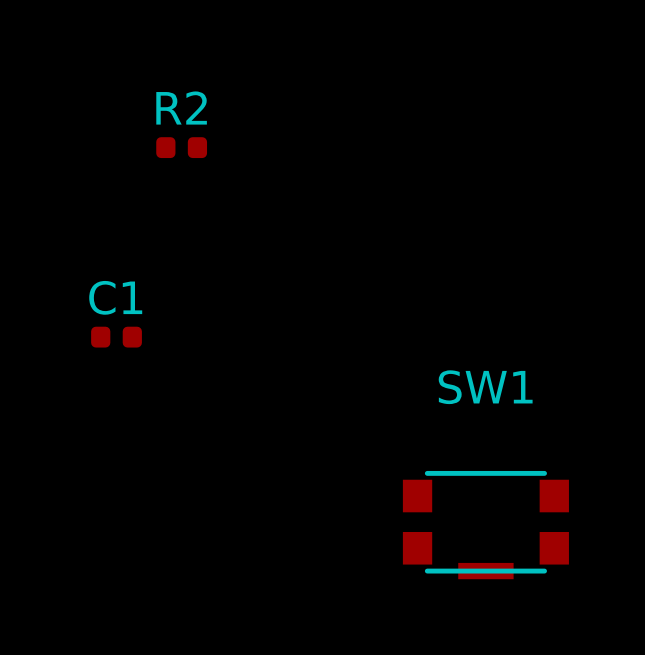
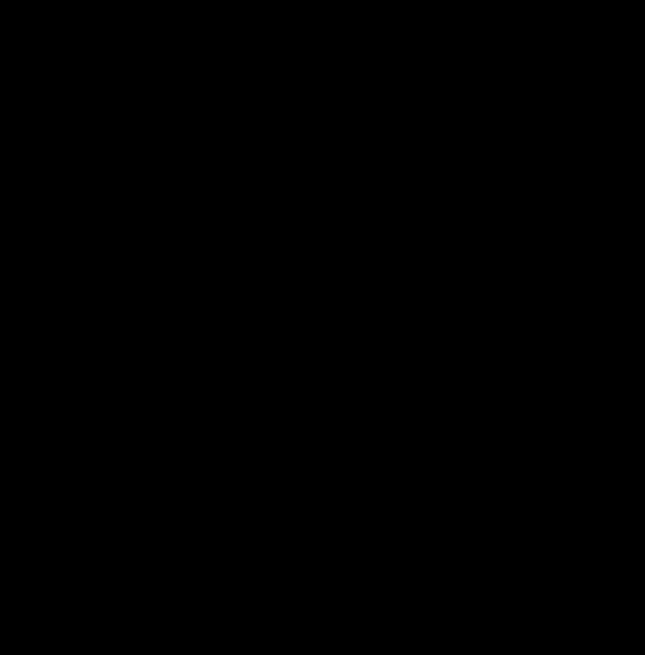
R2: (181, 147) -> none
C1: (116, 337) -> none
SW1: (485, 525) -> none

